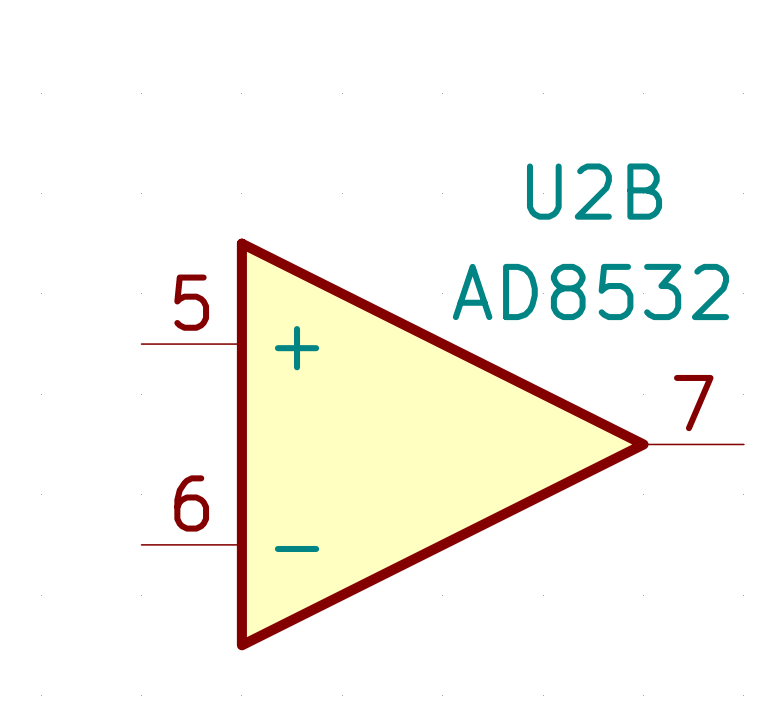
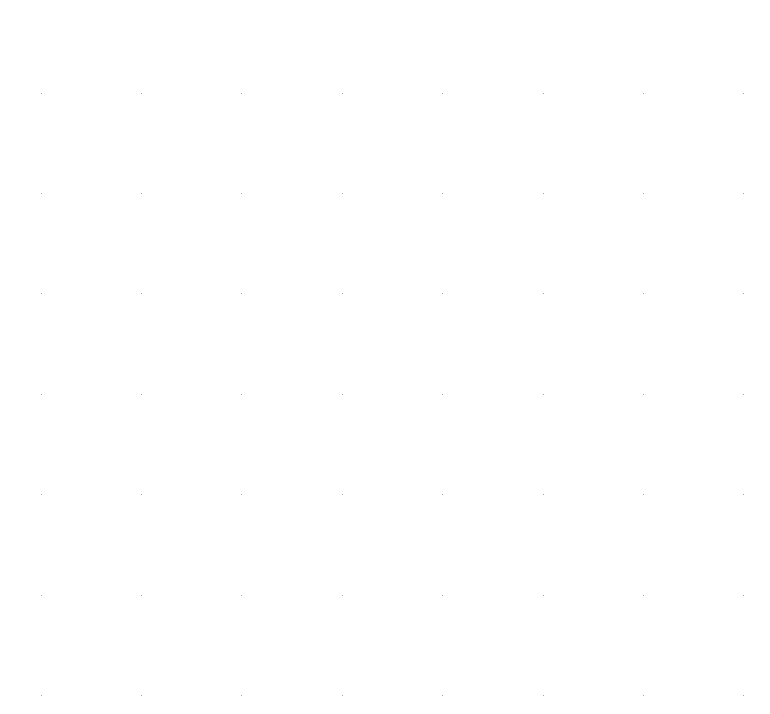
U2B: AD8532 (442, 444) -> none

